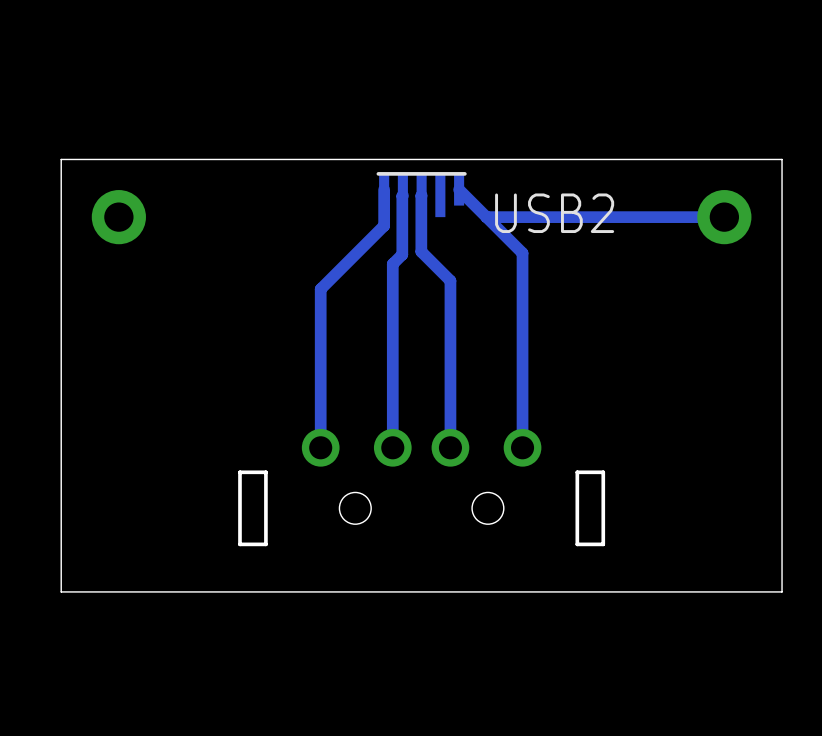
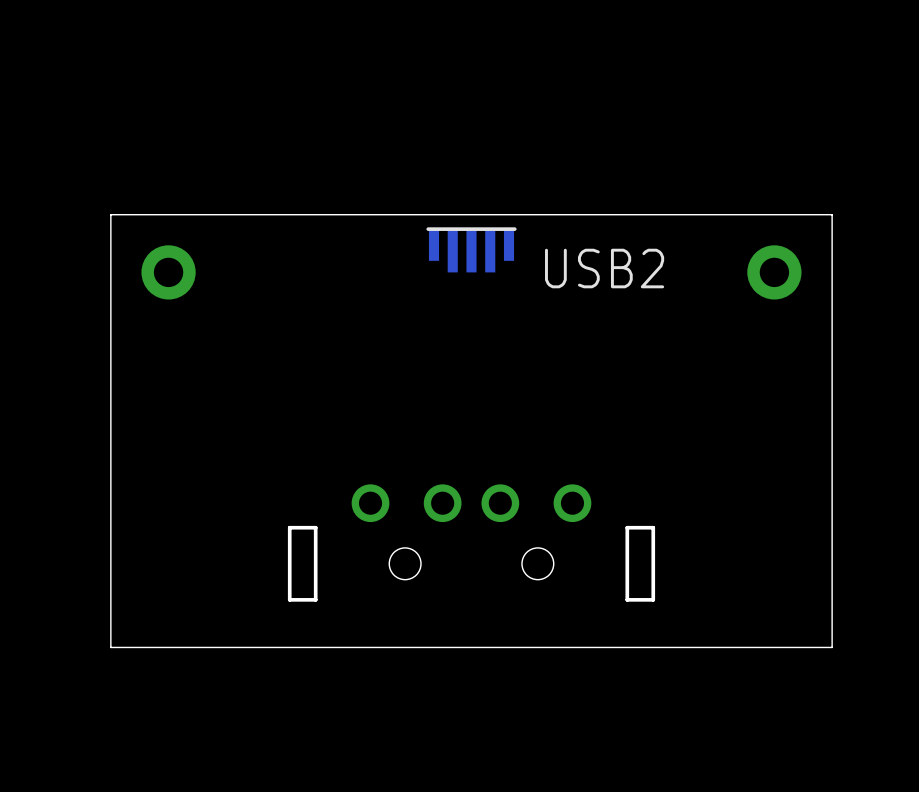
track: (384, 189) (384, 225) (320, 289) (320, 447) -> none
track: (459, 189) (522, 253) (522, 447) -> none
track: (402, 195) (402, 254) (392, 264) (392, 447) -> none
track: (421, 195) (421, 251) (450, 280) (450, 447) -> none
track: (724, 217) (486, 217) -> none

